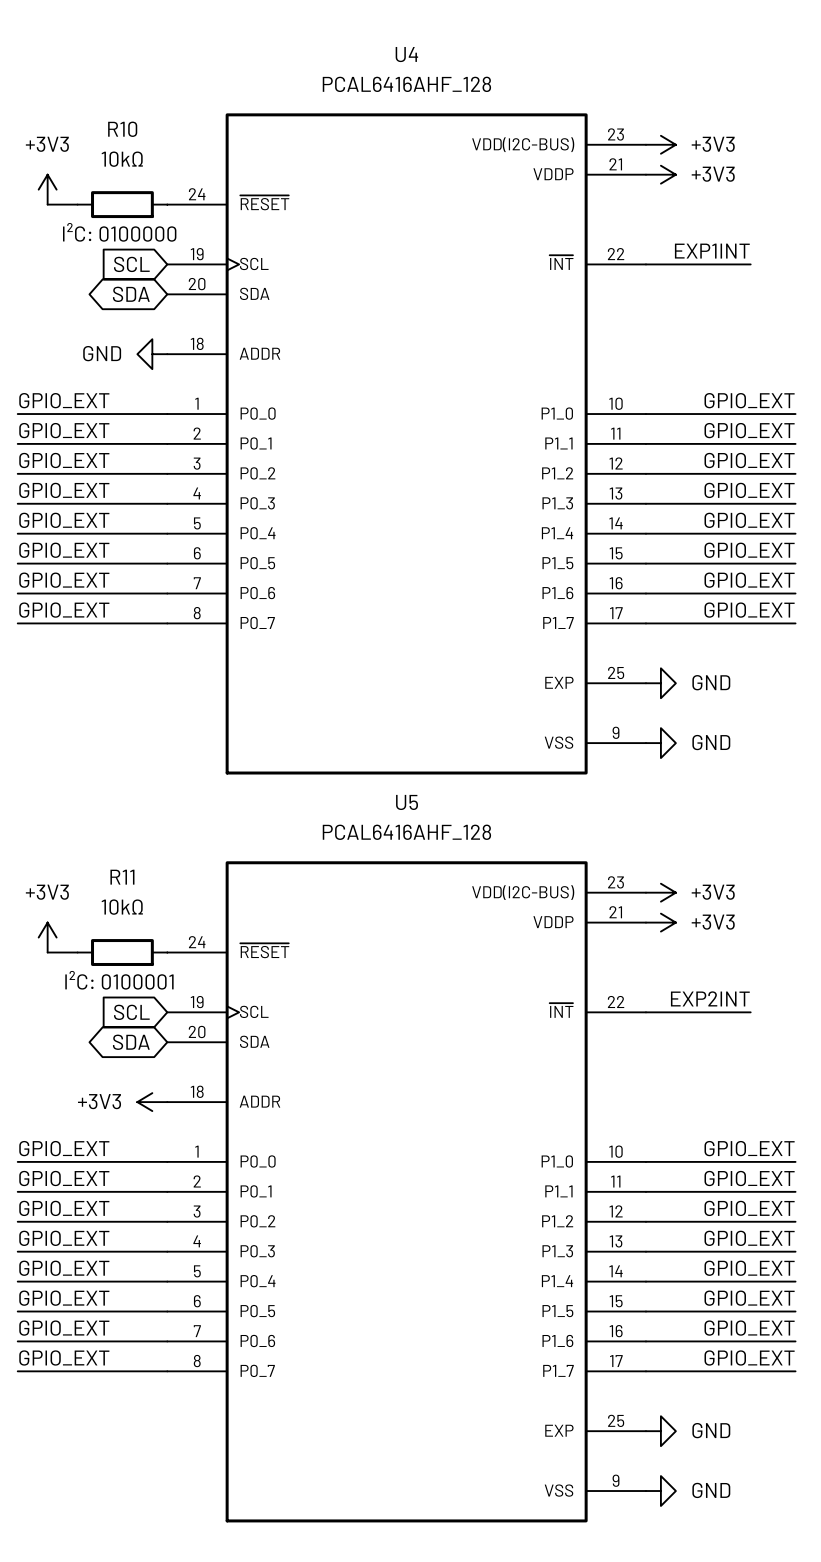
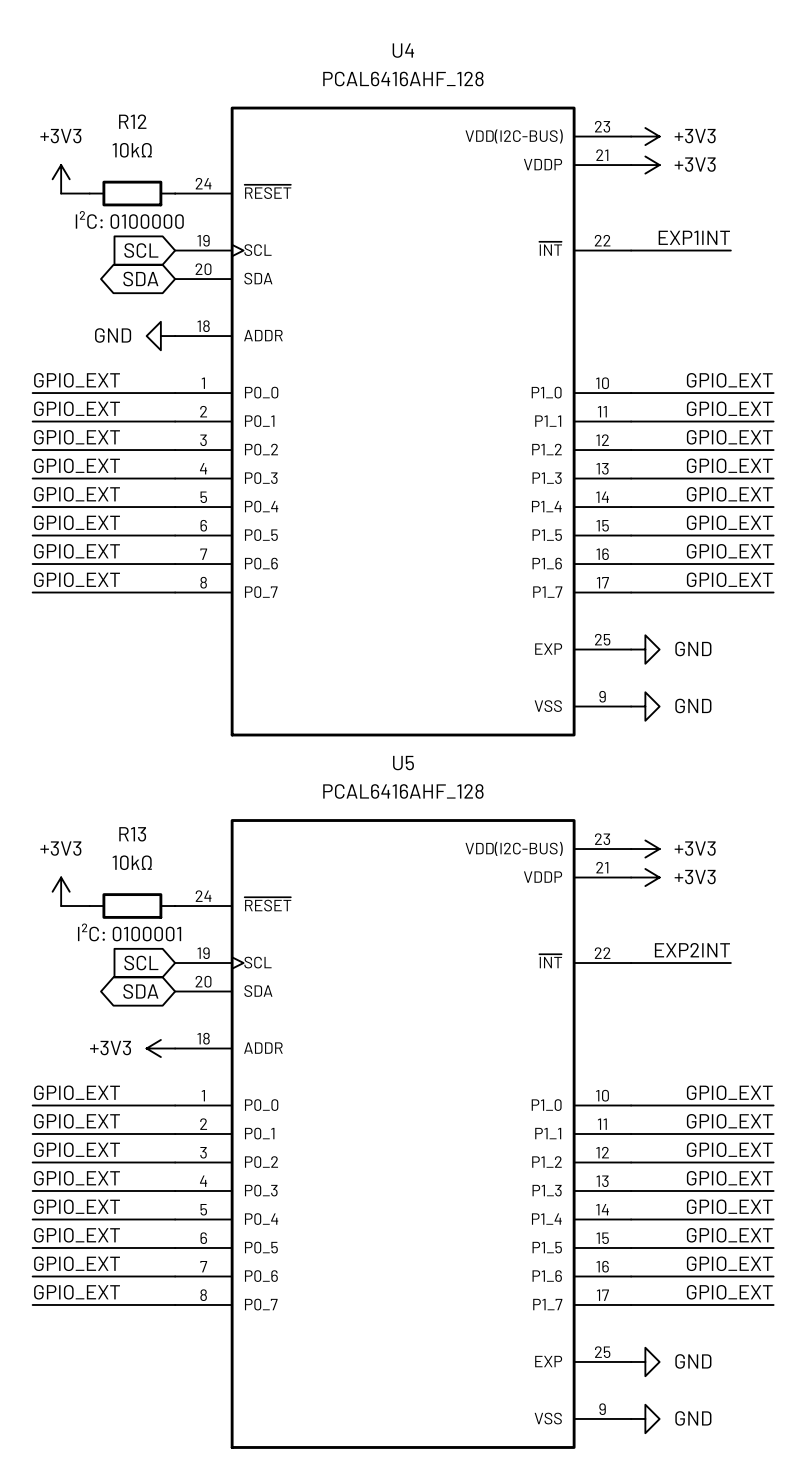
R10 name: R10 (122, 129) -> R12 (132, 121)
R11 name: R11 (122, 877) -> R13 (132, 834)

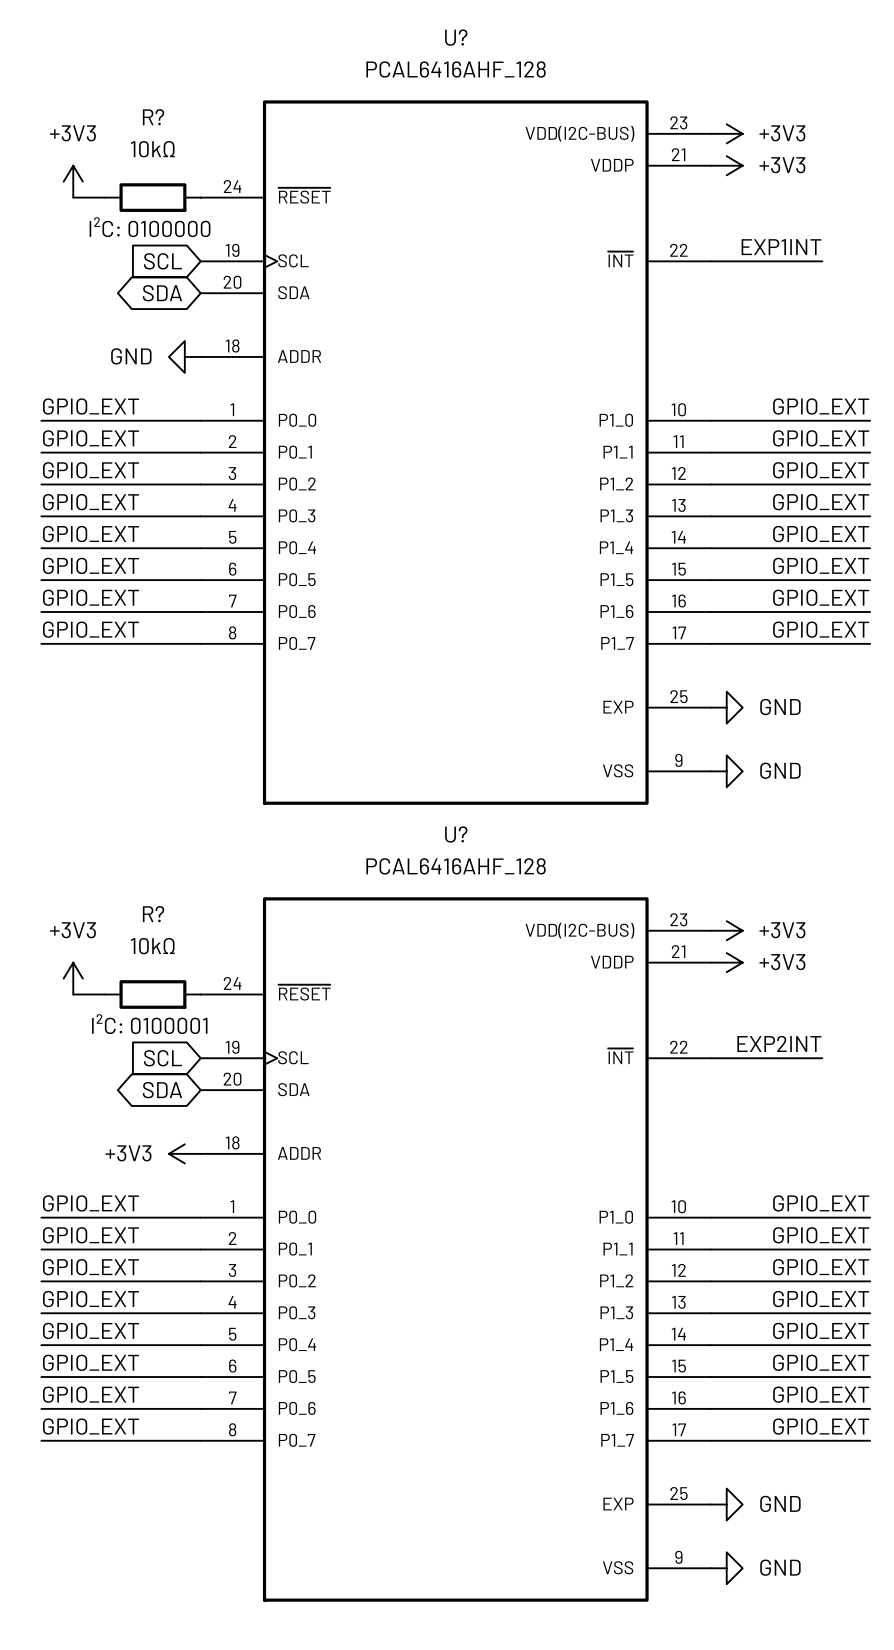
U4 name: U4 (403, 50) -> U? (456, 37)
R12 name: R12 (132, 121) -> R? (153, 117)
U5 name: U5 (403, 763) -> U? (456, 834)
R13 name: R13 (132, 834) -> R? (153, 914)

